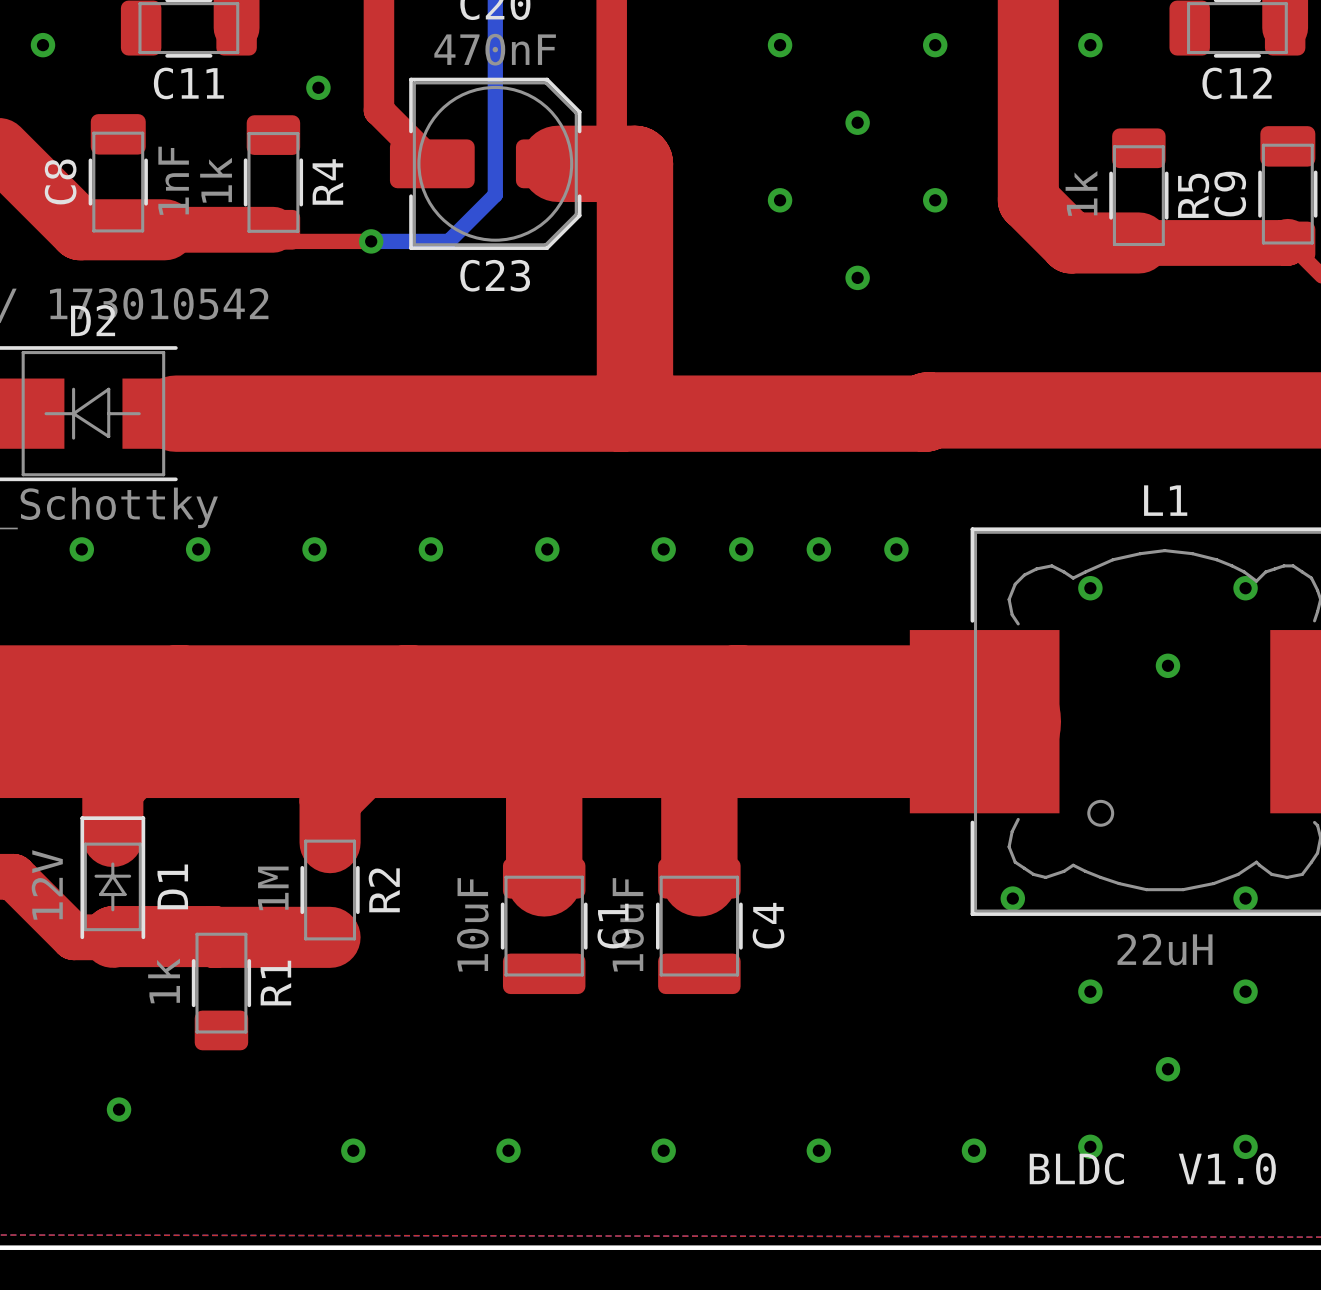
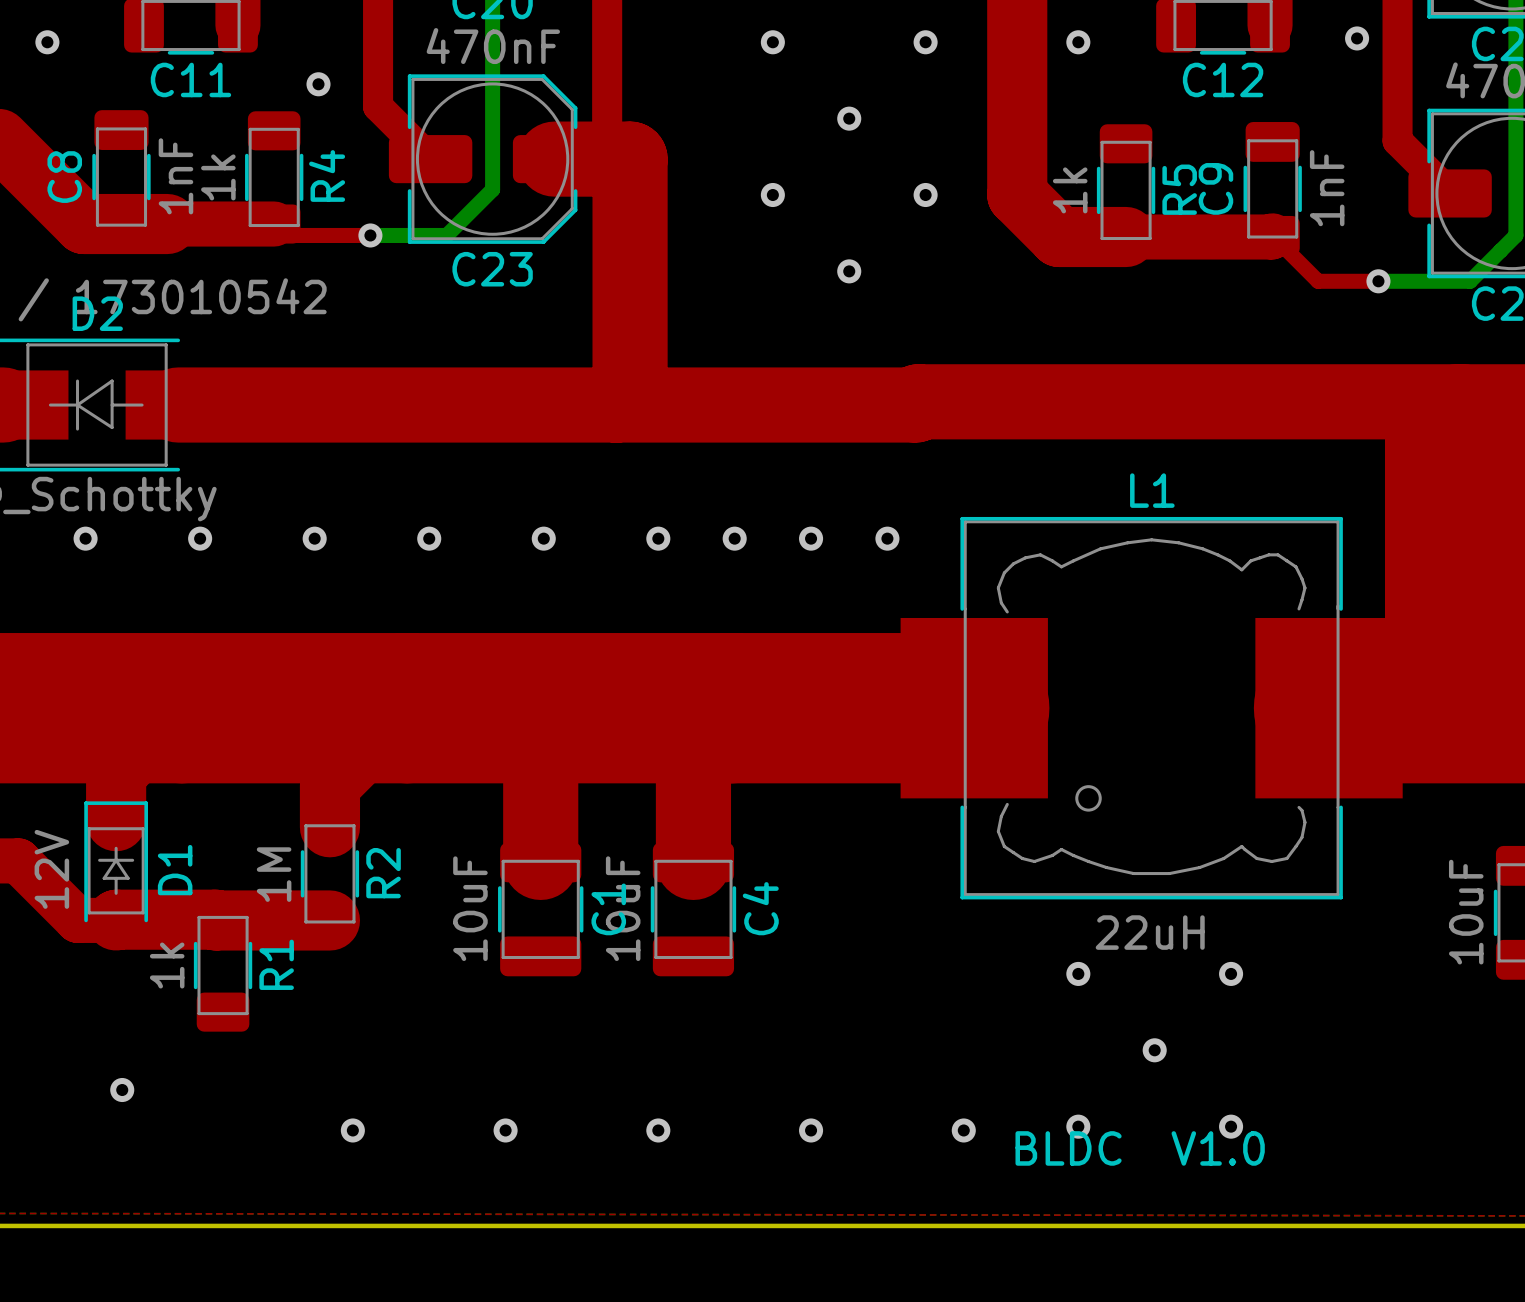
via: (1090, 588) -> none
via: (1245, 588) -> none
via: (1167, 665) -> none
via: (1012, 898) -> none
via: (1245, 898) -> none

